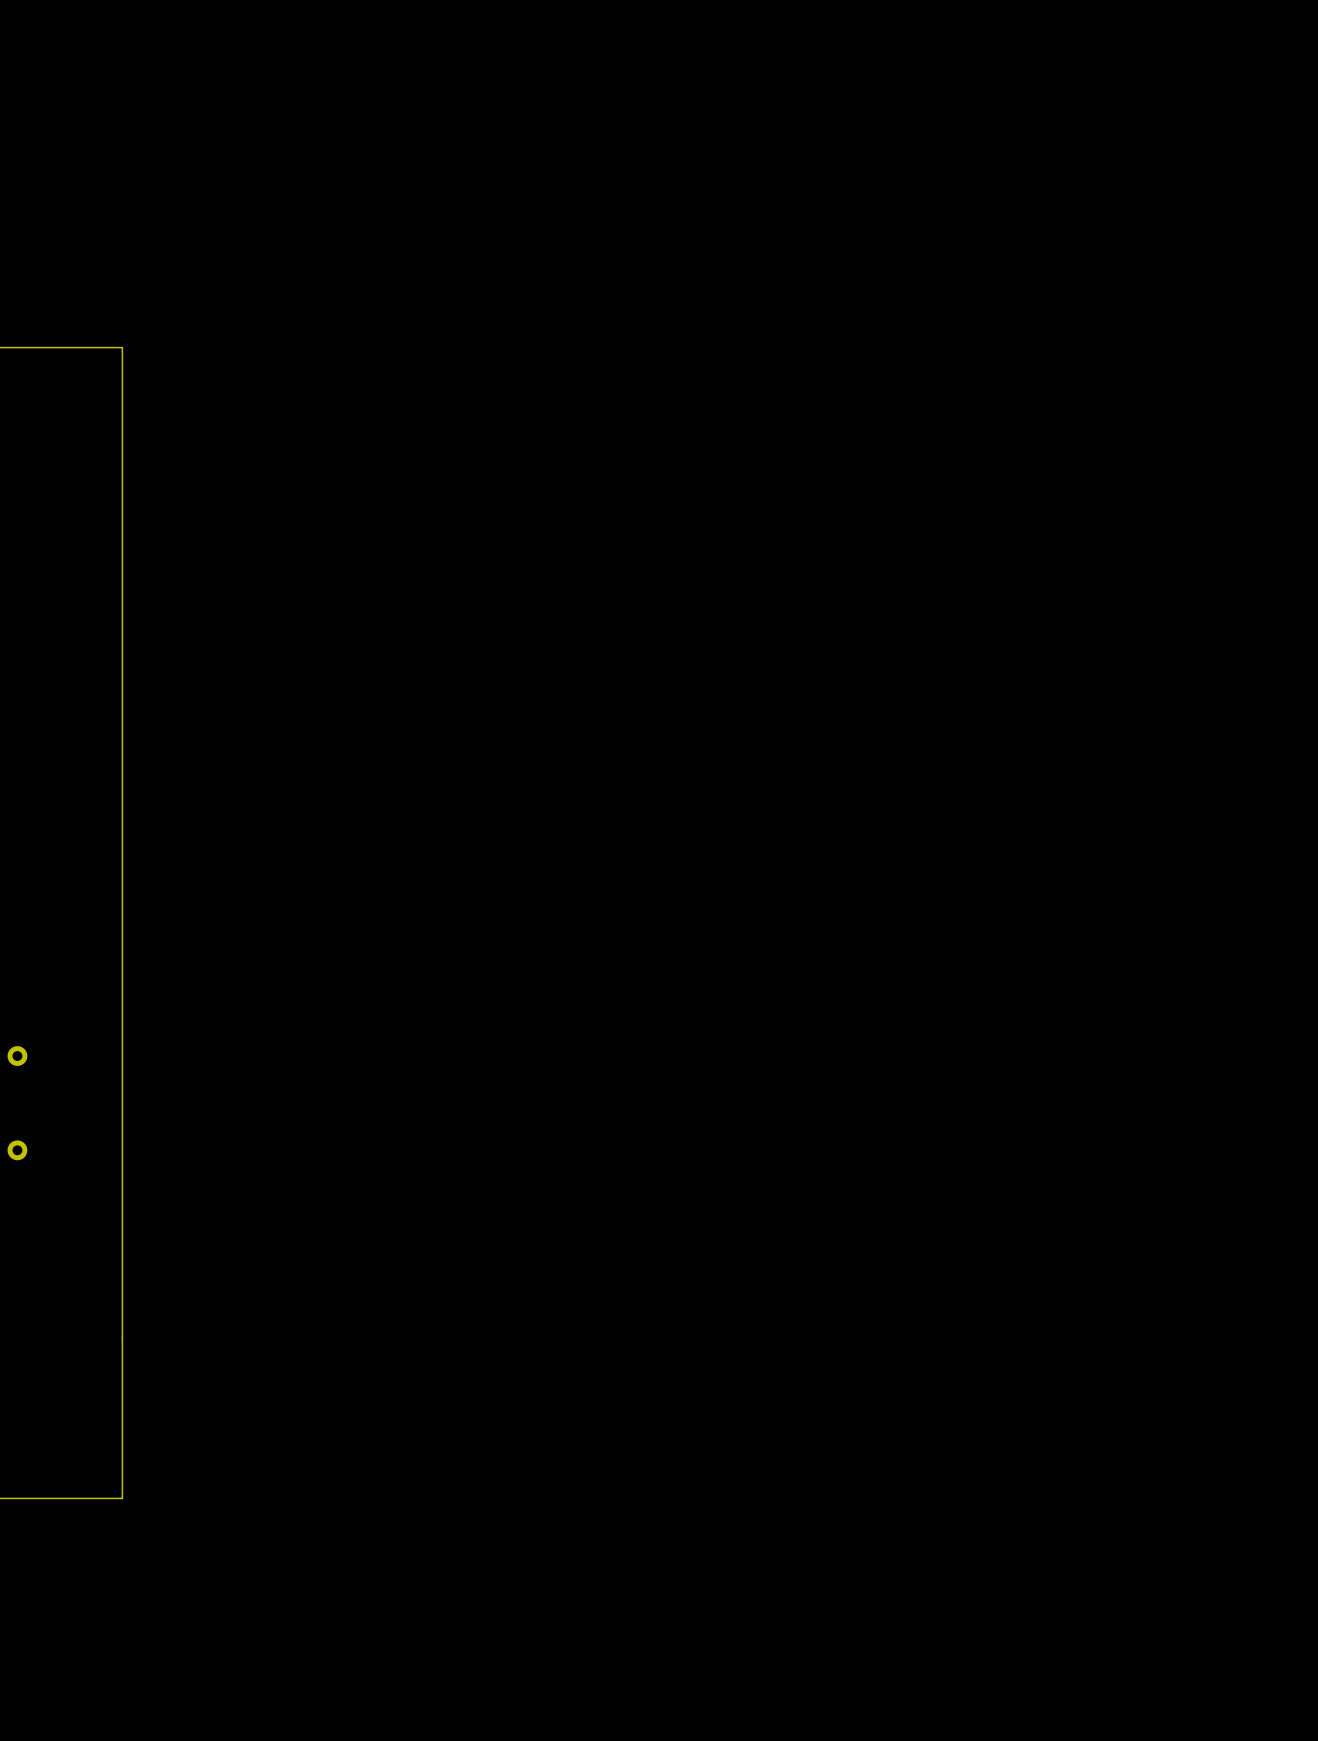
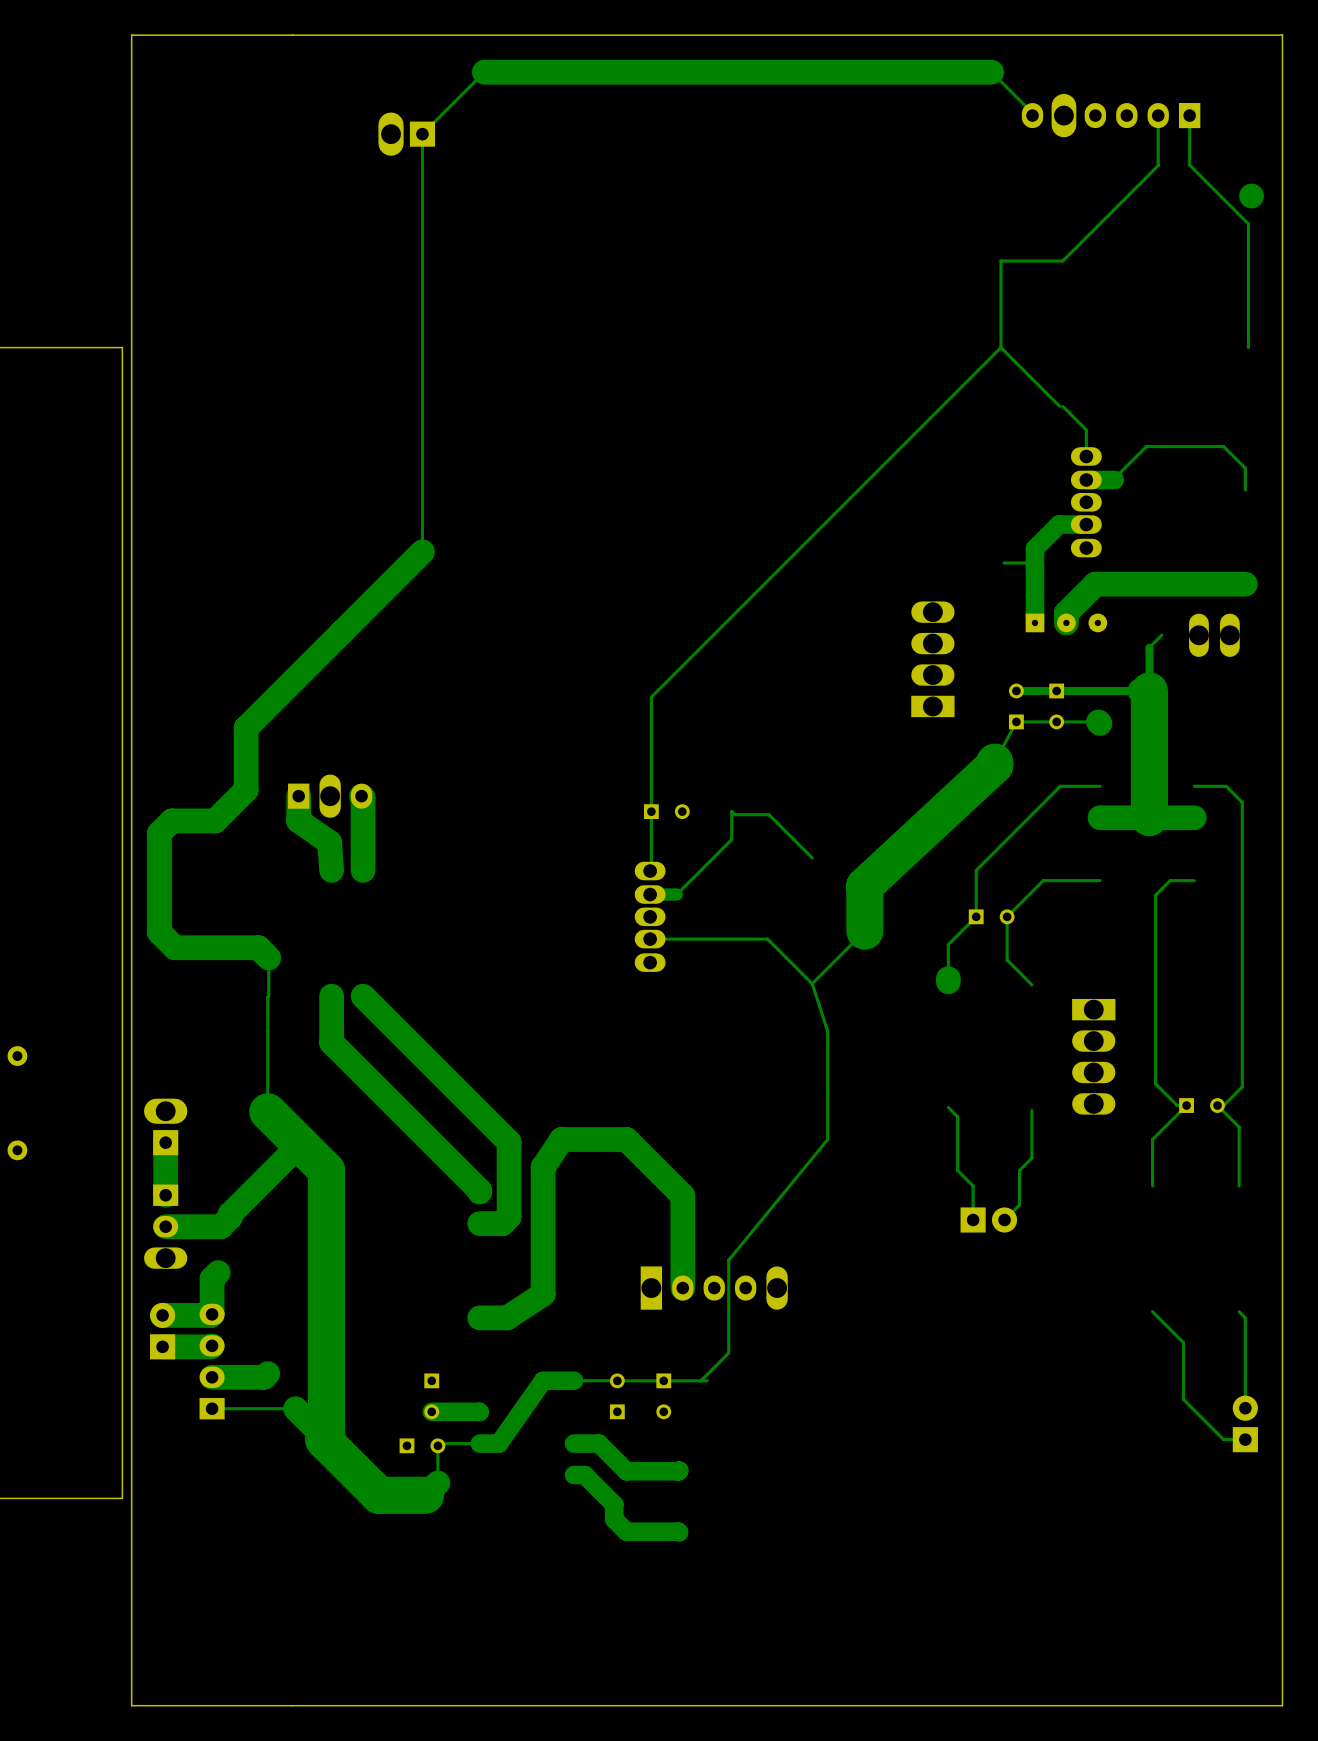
board edge: none -> (1282, 35) (131, 35) (131, 1705) (1282, 1705) (1282, 35)
track: none -> (1032, 115) (1032, 113) (991, 72) (484, 72) (422, 134) (422, 551) (246, 728) (246, 789) (215, 820) (171, 820) (159, 833) (159, 932) (174, 947) (258, 947) (268, 958) (267, 1111) (326, 1170) (326, 1442)
part: none -> (1111, 115)
track: none -> (1158, 115) (1158, 165) (1062, 260) (1000, 260) (1000, 347)
track: none -> (1189, 115) (1189, 165) (1248, 223) (1248, 347)
part: none -> (406, 134)
part: none -> (1251, 196)
track: none -> (1000, 347) (651, 697) (651, 869)
track: none -> (1000, 347) (1059, 406)
track: none -> (1062, 406) (1086, 429) (1086, 456)
track: none -> (1112, 479) (1146, 446) (1223, 446) (1245, 468) (1245, 489)
track: none -> (1114, 479) (1086, 479)
part: none -> (1086, 502)
track: none -> (1086, 524) (1059, 524) (1034, 548) (1034, 622)
track: none -> (1004, 563) (1034, 563) (1034, 567)
track: none -> (1245, 584) (1095, 584) (1066, 613) (1066, 622)
part: none -> (1066, 622)
track: none -> (1161, 635) (1149, 647)
part: none -> (1214, 635)
track: none -> (1149, 647) (1149, 690)
part: none -> (932, 659)
track: none -> (1149, 690) (1149, 817)
track: none -> (1149, 690) (1016, 690)
part: none -> (1016, 706)
part: none -> (1056, 706)
track: none -> (1098, 721) (1016, 721) (994, 765) (864, 885) (864, 931) (812, 983)
track: none -> (1098, 721) (1100, 723) (1098, 721)
track: none -> (1100, 786) (1060, 786) (976, 870) (976, 916) (948, 944) (948, 981) (948, 978)
track: none -> (1194, 786) (1226, 786) (1242, 802) (1242, 1086) (1223, 1105) (1217, 1105) (1239, 1127) (1239, 1185)
track: none -> (298, 796) (298, 820) (329, 842) (331, 870)
part: none -> (330, 796)
track: none -> (361, 796) (363, 870)
part: none -> (666, 811)
track: none -> (1194, 817) (1100, 817)
track: none -> (812, 858) (768, 814) (734, 814) (731, 811) (731, 839) (676, 894) (650, 894)
track: none -> (1100, 880) (1043, 880) (1007, 916) (1007, 960) (1031, 984)
track: none -> (1194, 880) (1170, 880) (1155, 895) (1155, 1083) (1177, 1105) (1186, 1105) (1152, 1139) (1152, 1185)
part: none -> (650, 916)
part: none -> (991, 916)
track: none -> (650, 939) (767, 939) (812, 983)
track: none -> (812, 983) (827, 1031) (827, 1139) (728, 1260) (728, 1353) (700, 1380)
track: none -> (331, 996) (331, 1042) (479, 1192)
track: none -> (363, 996) (509, 1142) (509, 1216) (502, 1223) (479, 1223)
part: none -> (1093, 1056)
part: none -> (1202, 1105)
track: none -> (948, 1107) (957, 1116) (957, 1170) (973, 1185) (973, 1219)
track: none -> (1031, 1110) (1031, 1158) (1019, 1170) (1019, 1205) (1004, 1219)
part: none -> (165, 1126)
track: none -> (165, 1142) (165, 1195)
track: none -> (300, 1144) (230, 1214) (230, 1217) (220, 1226) (165, 1226)
part: none -> (988, 1219)
part: none -> (165, 1226)
track: none -> (218, 1272) (212, 1278) (211, 1315) (162, 1315)
track: none -> (682, 1288) (682, 1195) (626, 1139) (561, 1139) (543, 1167) (543, 1294) (507, 1317) (479, 1317)
part: none -> (714, 1288)
track: none -> (1152, 1311) (1183, 1342) (1183, 1399) (1223, 1439) (1245, 1439)
track: none -> (1239, 1311) (1245, 1317) (1245, 1408)
part: none -> (162, 1331)
track: none -> (212, 1345) (162, 1346)
part: none -> (212, 1361)
track: none -> (267, 1373) (264, 1377) (212, 1377)
track: none -> (617, 1380) (543, 1380) (498, 1443) (440, 1443) (437, 1445) (437, 1482) (425, 1495) (379, 1495) (295, 1408) (212, 1408)
track: none -> (707, 1380) (617, 1380)
part: none -> (431, 1396)
part: none -> (617, 1396)
part: none -> (663, 1396)
track: none -> (431, 1411) (479, 1412)
part: none -> (1245, 1423)
track: none -> (574, 1443) (598, 1443) (626, 1471) (679, 1470)
part: none -> (422, 1445)
track: none -> (574, 1475) (584, 1475) (614, 1504) (614, 1519) (626, 1531) (679, 1532)

